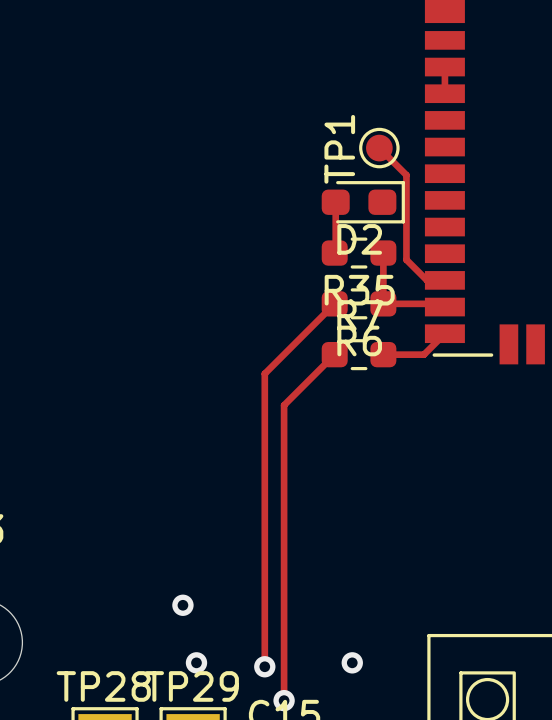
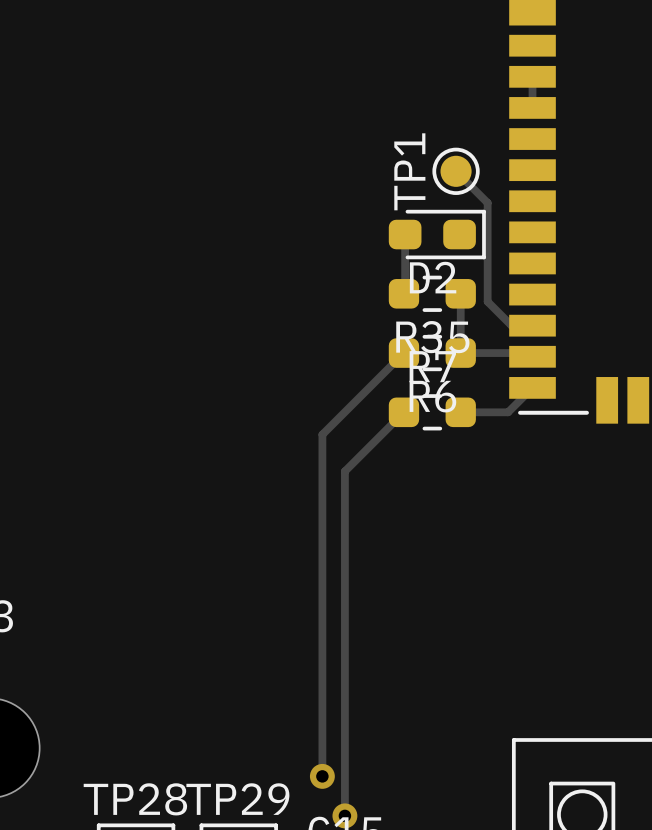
via: (182, 605) -> none
via: (196, 662) -> none
via: (352, 662) -> none

